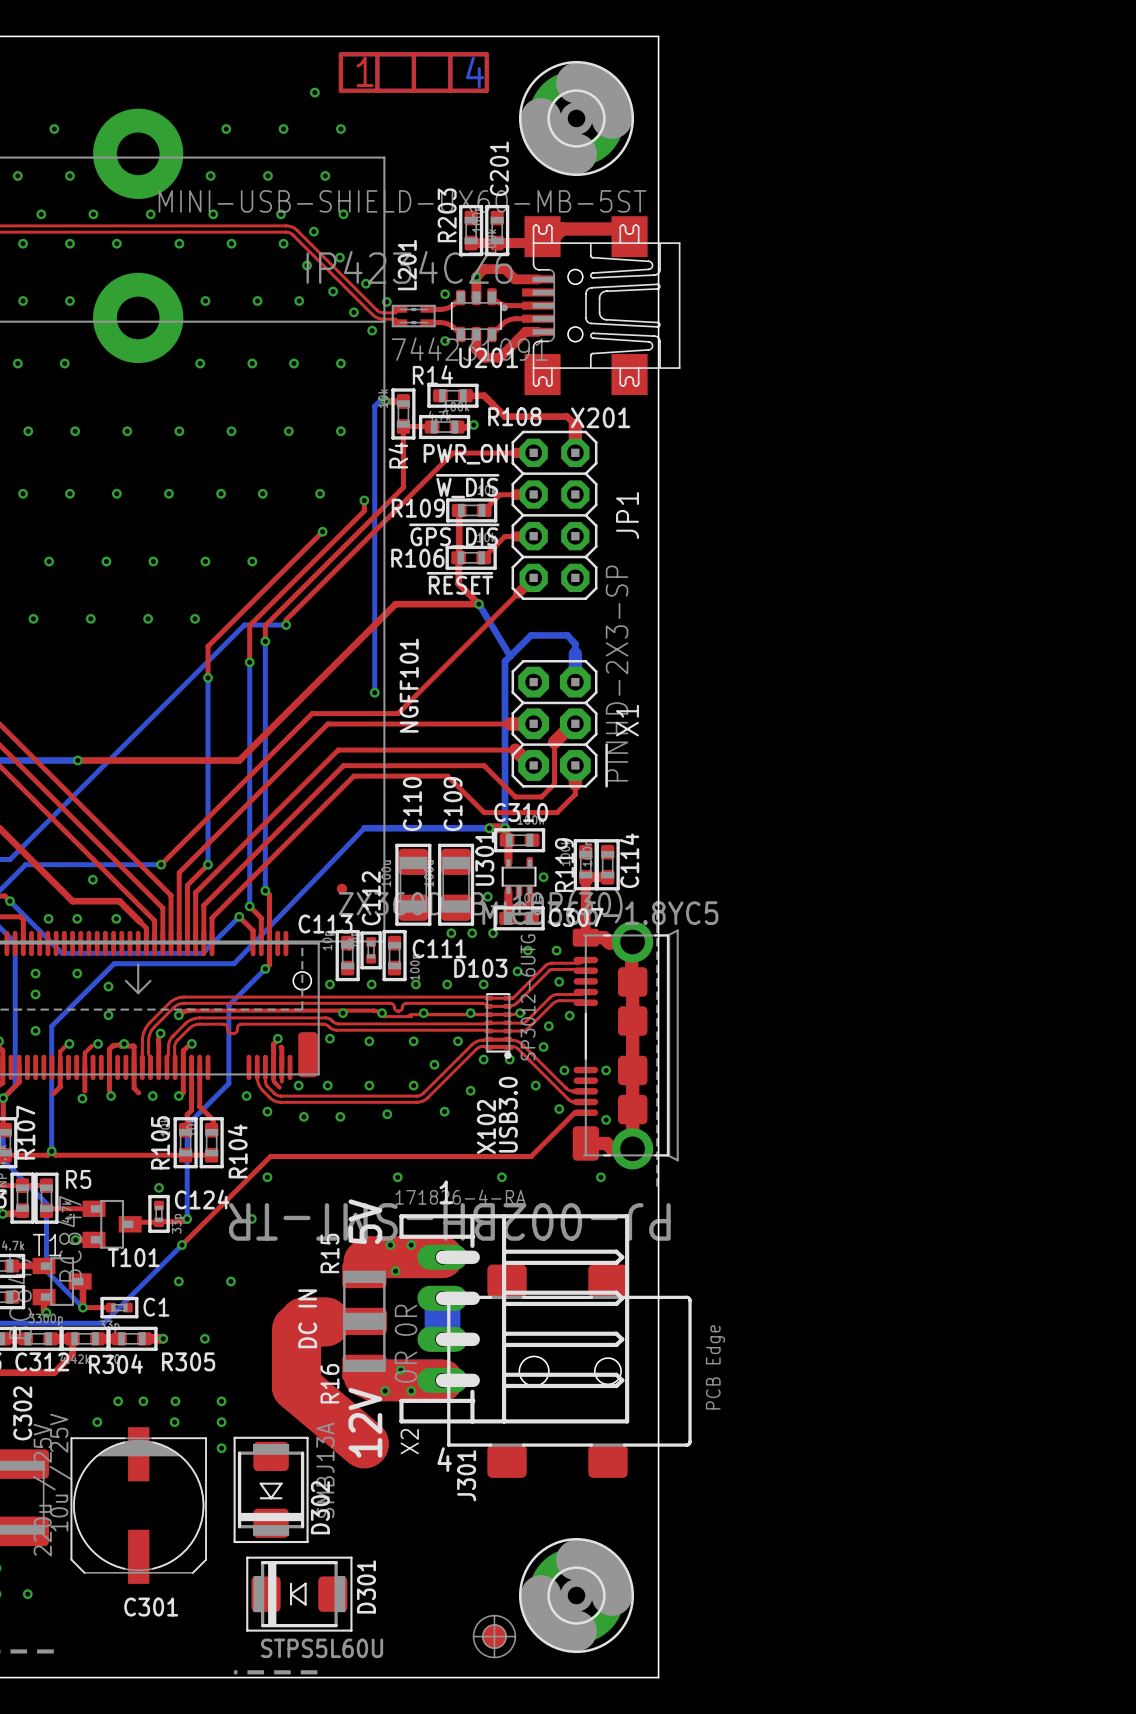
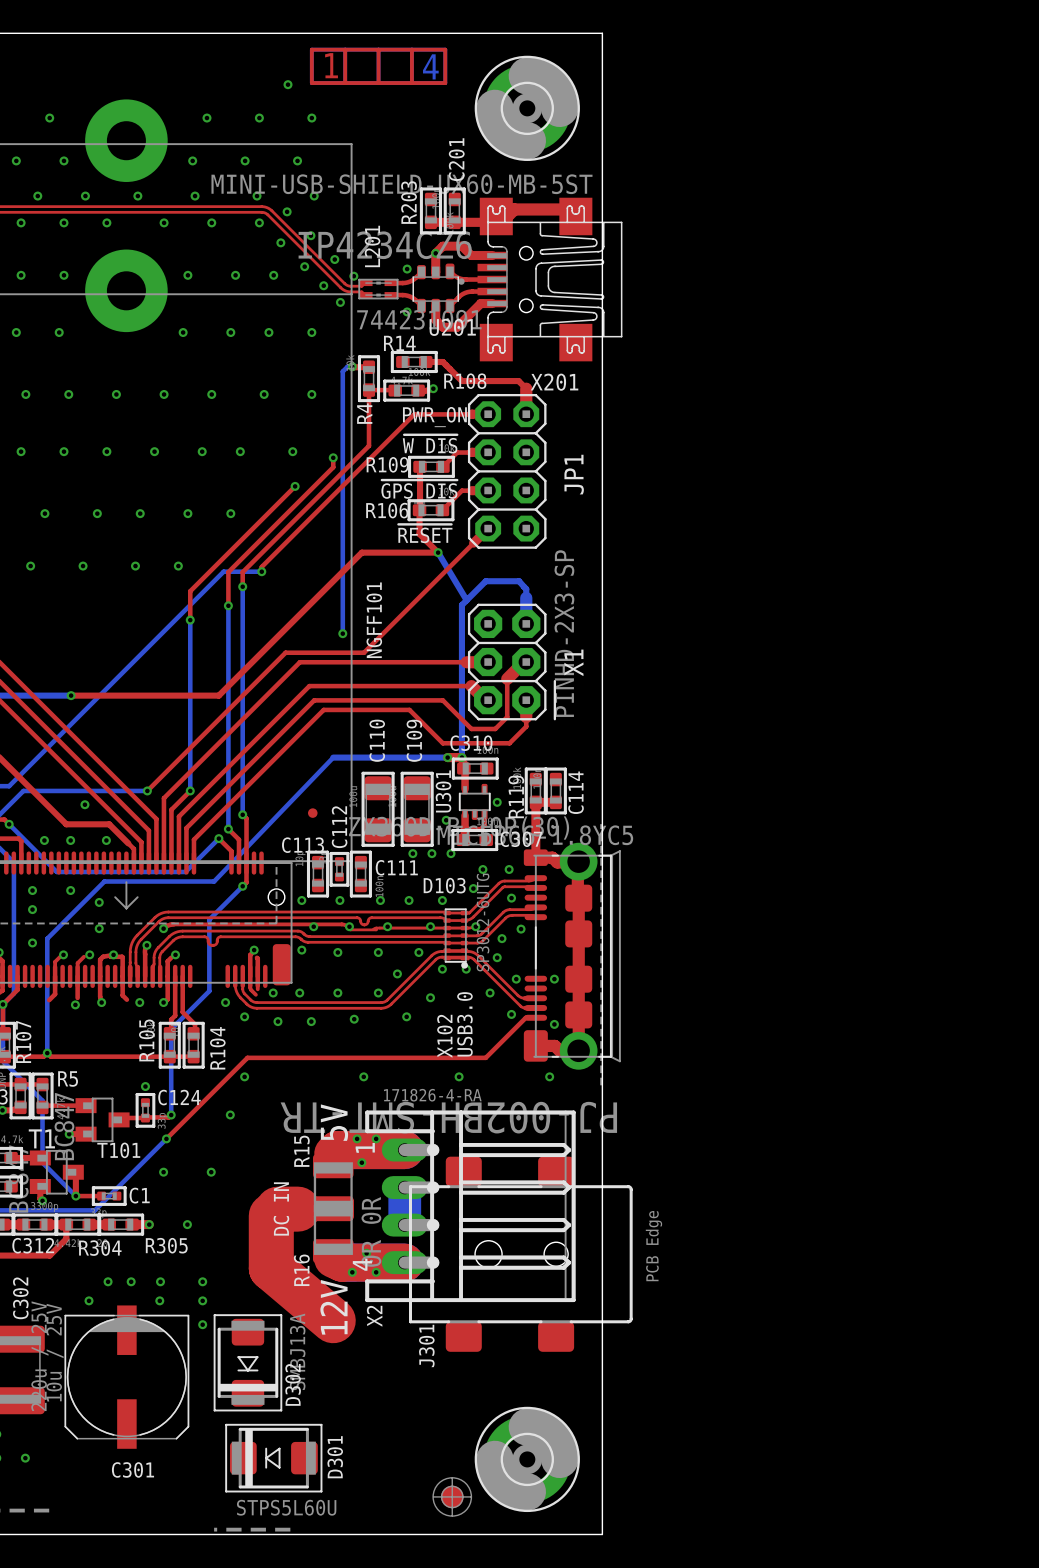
X2 footprint: [399, 1214, 630, 1424] -> [365, 1110, 576, 1303]

